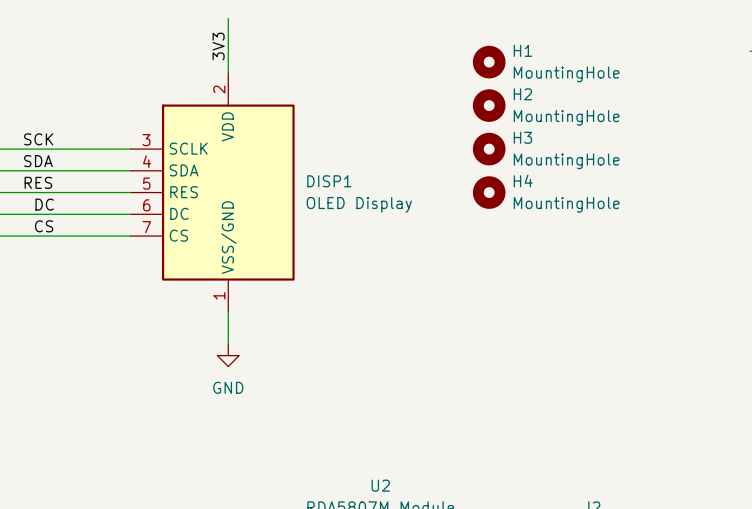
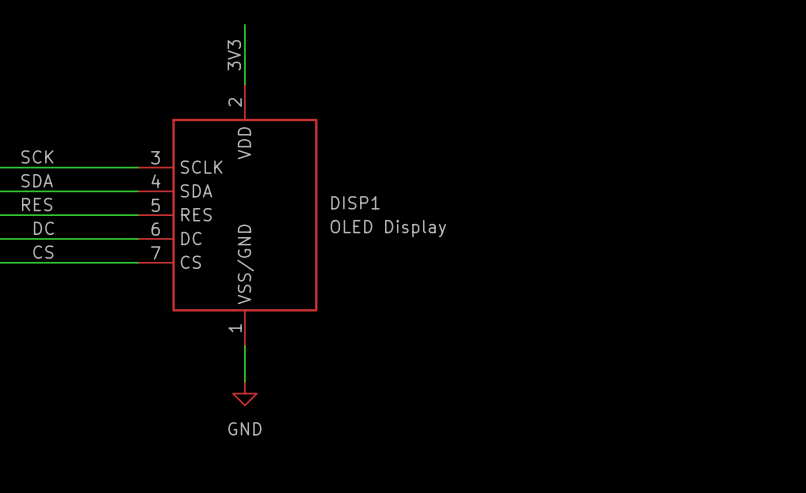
H1: MountingHole (489, 62) -> none
H2: MountingHole (489, 105) -> none
H3: MountingHole (489, 149) -> none
H4: MountingHole (489, 192) -> none

